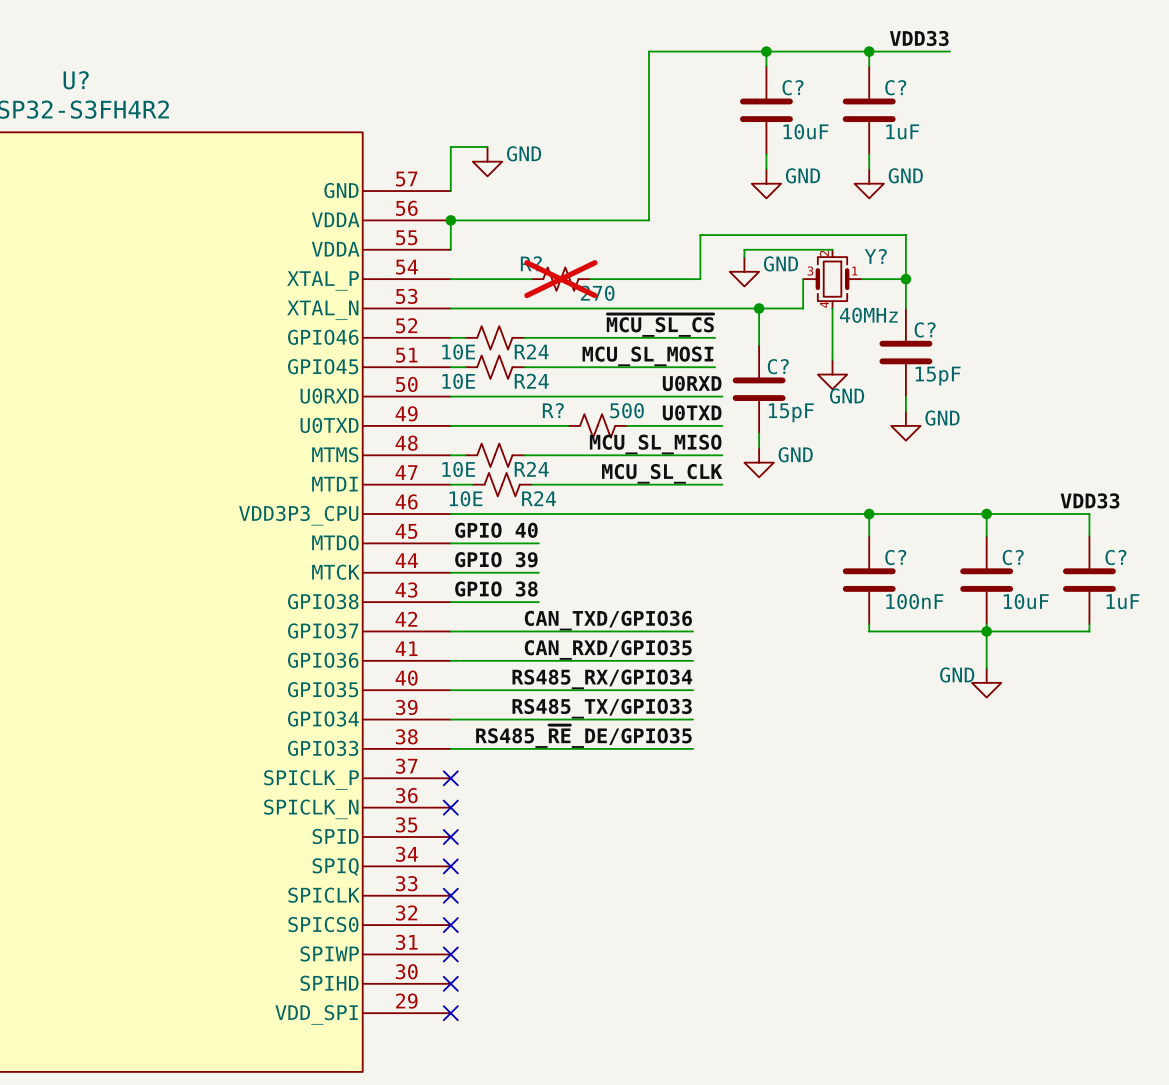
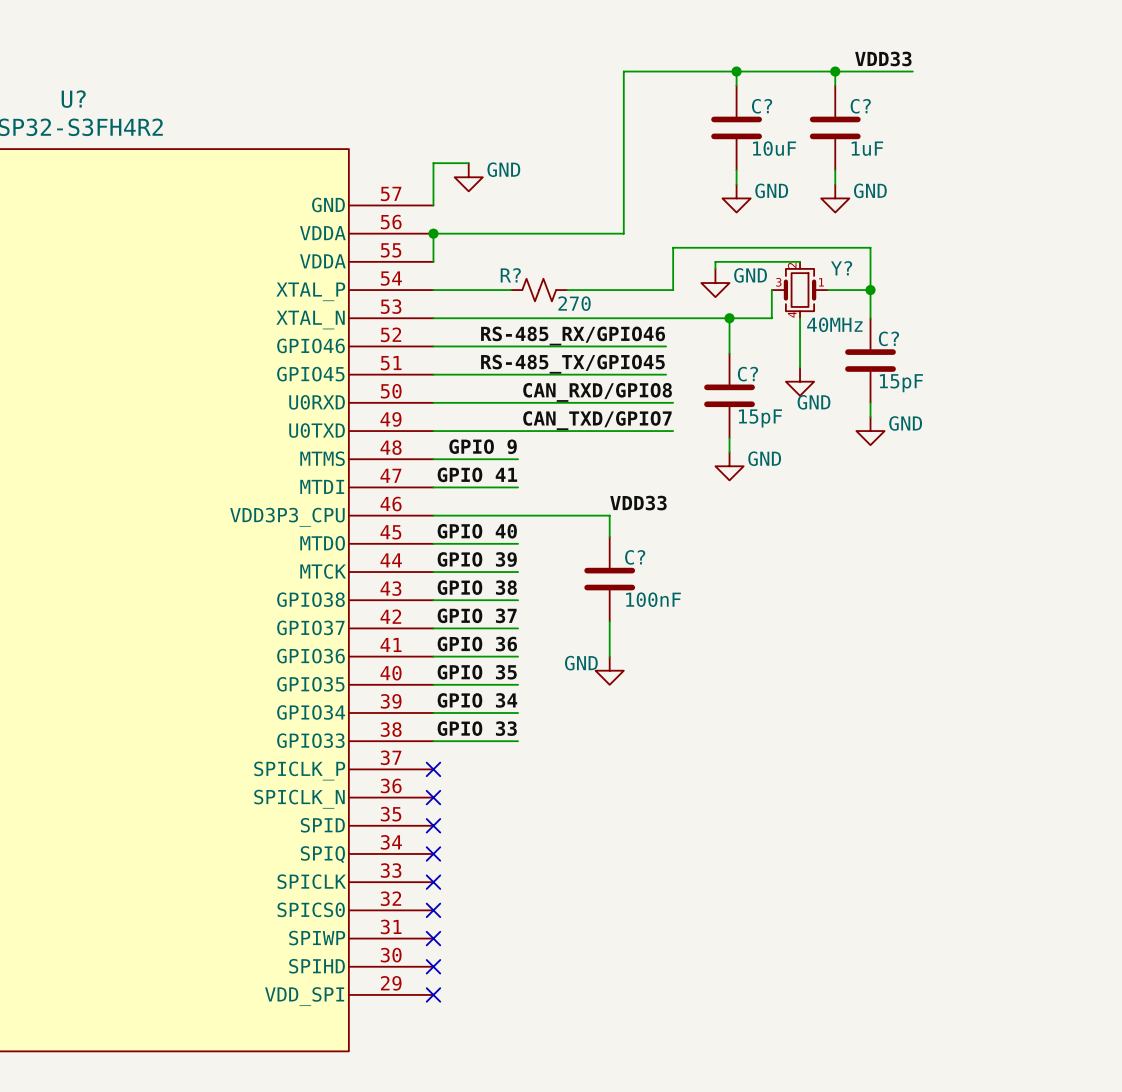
R? do-not-place cross: (560, 279) -> none
label: ~{MCU_SL_CS} (660, 325) -> none
label: none -> RS-485_RX/GPIO46 (573, 336)
R24: 10E (494, 337) -> none
wire: (693, 337) (715, 337) -> none
label: none -> RS-485_TX/GPIO45 (572, 364)
label: MCU_SL_MOSI (647, 356) -> none
R24: 10E (494, 367) -> none
wire: (693, 367) (715, 367) -> none
label: U0RXD (692, 383) -> none
label: none -> CAN_RXD/GPIO8 (597, 392)
wire: (700, 396) (722, 396) -> none
label: U0TXD (692, 412) -> none
label: none -> CAN_TXD/GPIO7 (597, 420)
R?: 500 (597, 425) -> none
wire: (700, 425) (722, 425) -> none
label: none -> GPIO 9 (483, 446)
label: MCU_SL_MISO (655, 444) -> none
R24: 10E (494, 455) -> none
wire: (538, 455) (722, 455) -> none
label: none -> GPIO 41 (477, 474)
label: MCU_SL_CLK (662, 473) -> none
R24: 10E (502, 484) -> none
wire: (538, 484) (722, 484) -> none
label: none -> VDD33 (638, 503)
label: VDD33 (1090, 500) -> none
wire: (634, 514) (1089, 514) (1089, 536) -> (609, 515) (609, 536)
wire: (869, 514) (869, 536) -> none
junction: (869, 514) -> none
wire: (986, 514) (986, 536) -> none
junction: (986, 514) -> none
C? position: (869, 580) -> (609, 579)
C?: 10uF (986, 580) -> none
C?: 1uF (1089, 580) -> none
label: none -> GPIO 37 (477, 615)
label: CAN_TXD/GPIO36 (608, 620) -> none
wire: none -> (609, 621) (609, 656)
wire: (869, 624) (869, 631) (1089, 631) (1089, 624) -> none
wire: (986, 624) (986, 668) -> none
wire: (538, 631) (693, 631) -> none
junction: (986, 631) -> none
label: none -> GPIO 36 (477, 644)
label: CAN_RXD/GPIO35 (608, 649) -> none
wire: (538, 660) (693, 660) -> none
power symbol: none -> GND (609, 670)
label: none -> GPIO 35 (477, 672)
label: RS485_RX/GPIO34 (602, 679) -> none
power symbol: GND (986, 682) -> none
wire: (538, 690) (693, 690) -> none
label: none -> GPIO 34 (477, 700)
label: RS485_TX/GPIO33 (602, 708) -> none
wire: (538, 719) (693, 719) -> none
label: none -> GPIO 33 (477, 728)
label: RS485_~{RE}_DE/GPIO35 (583, 736) -> none
wire: (538, 748) (693, 748) -> none

